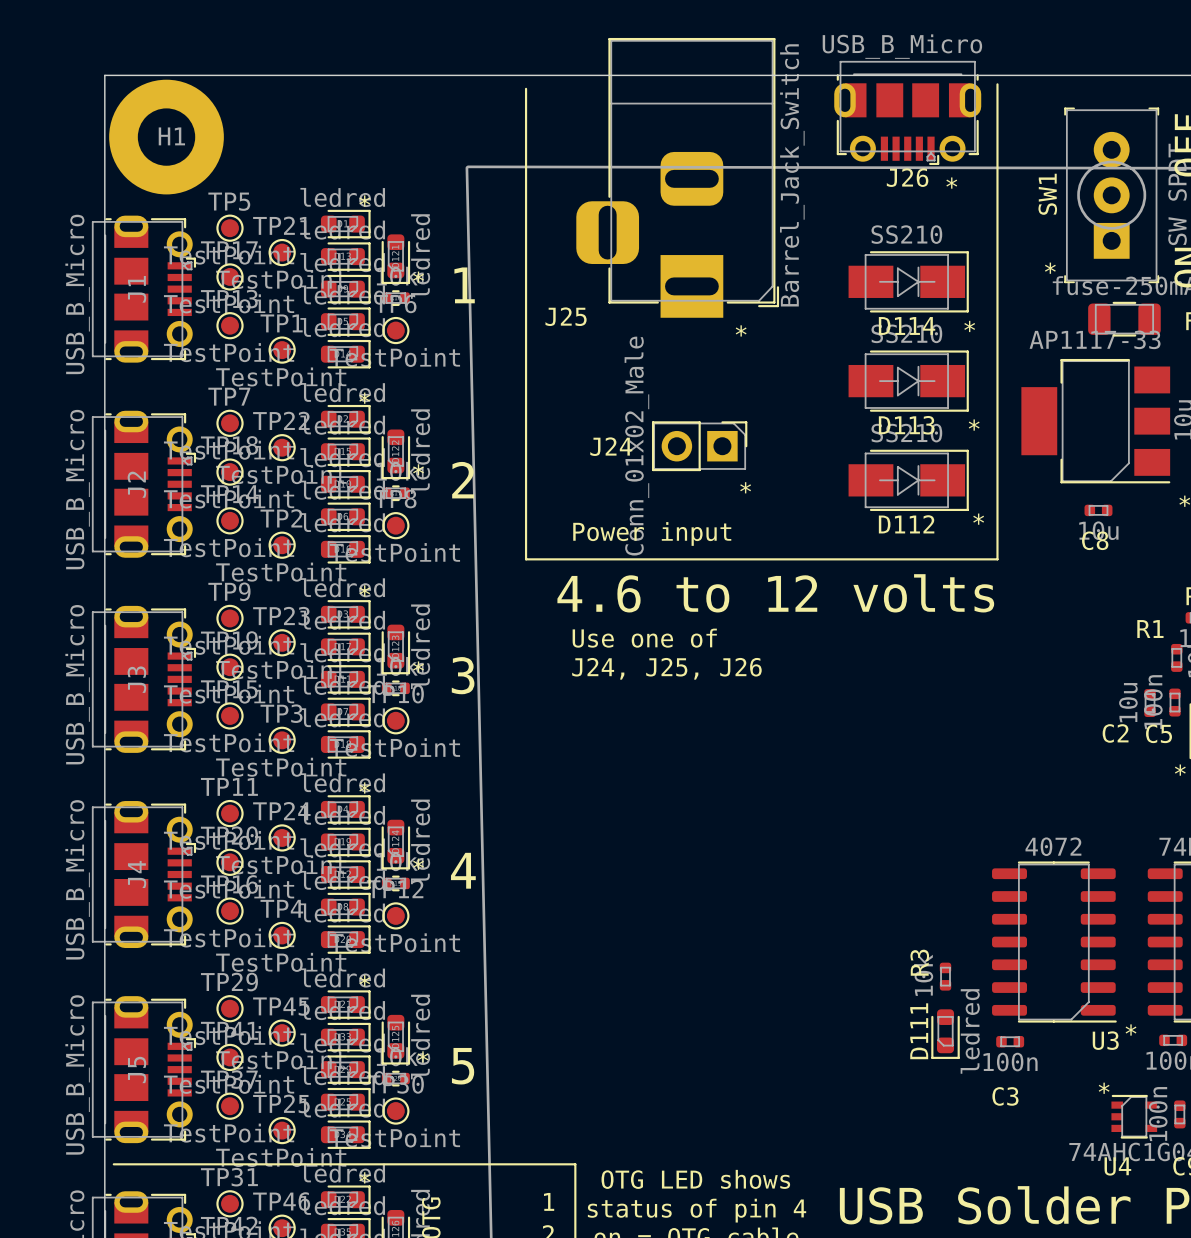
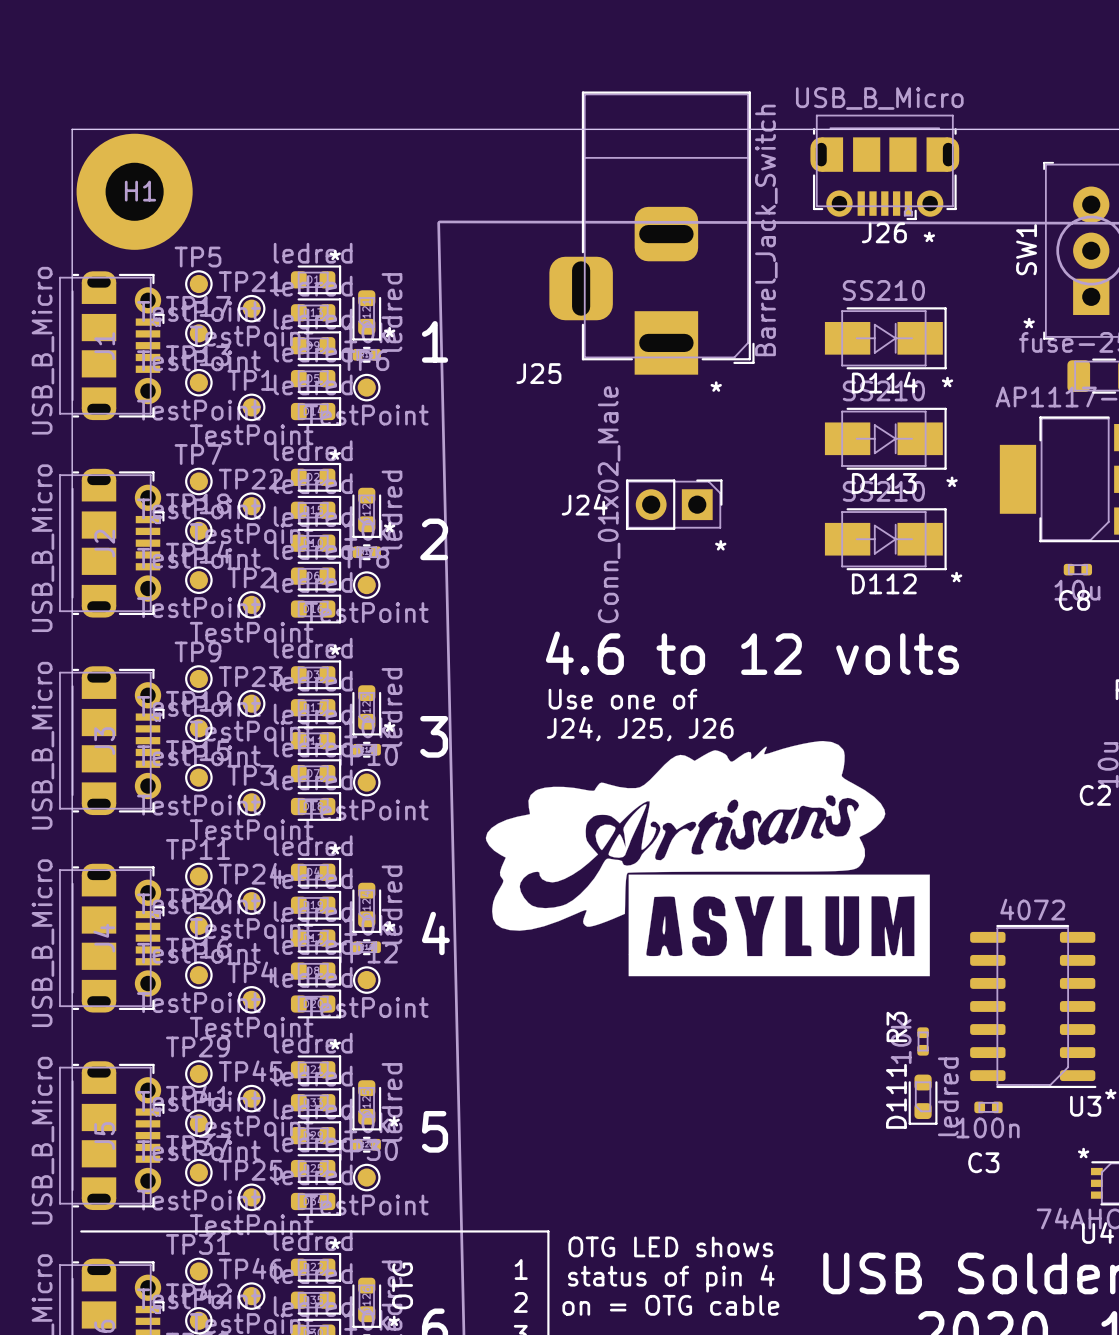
line: (997, 84) (997, 559) (526, 559) (526, 88) -> none
text: Power input (652, 533) -> none
drawing: none -> [485, 740, 930, 977]

